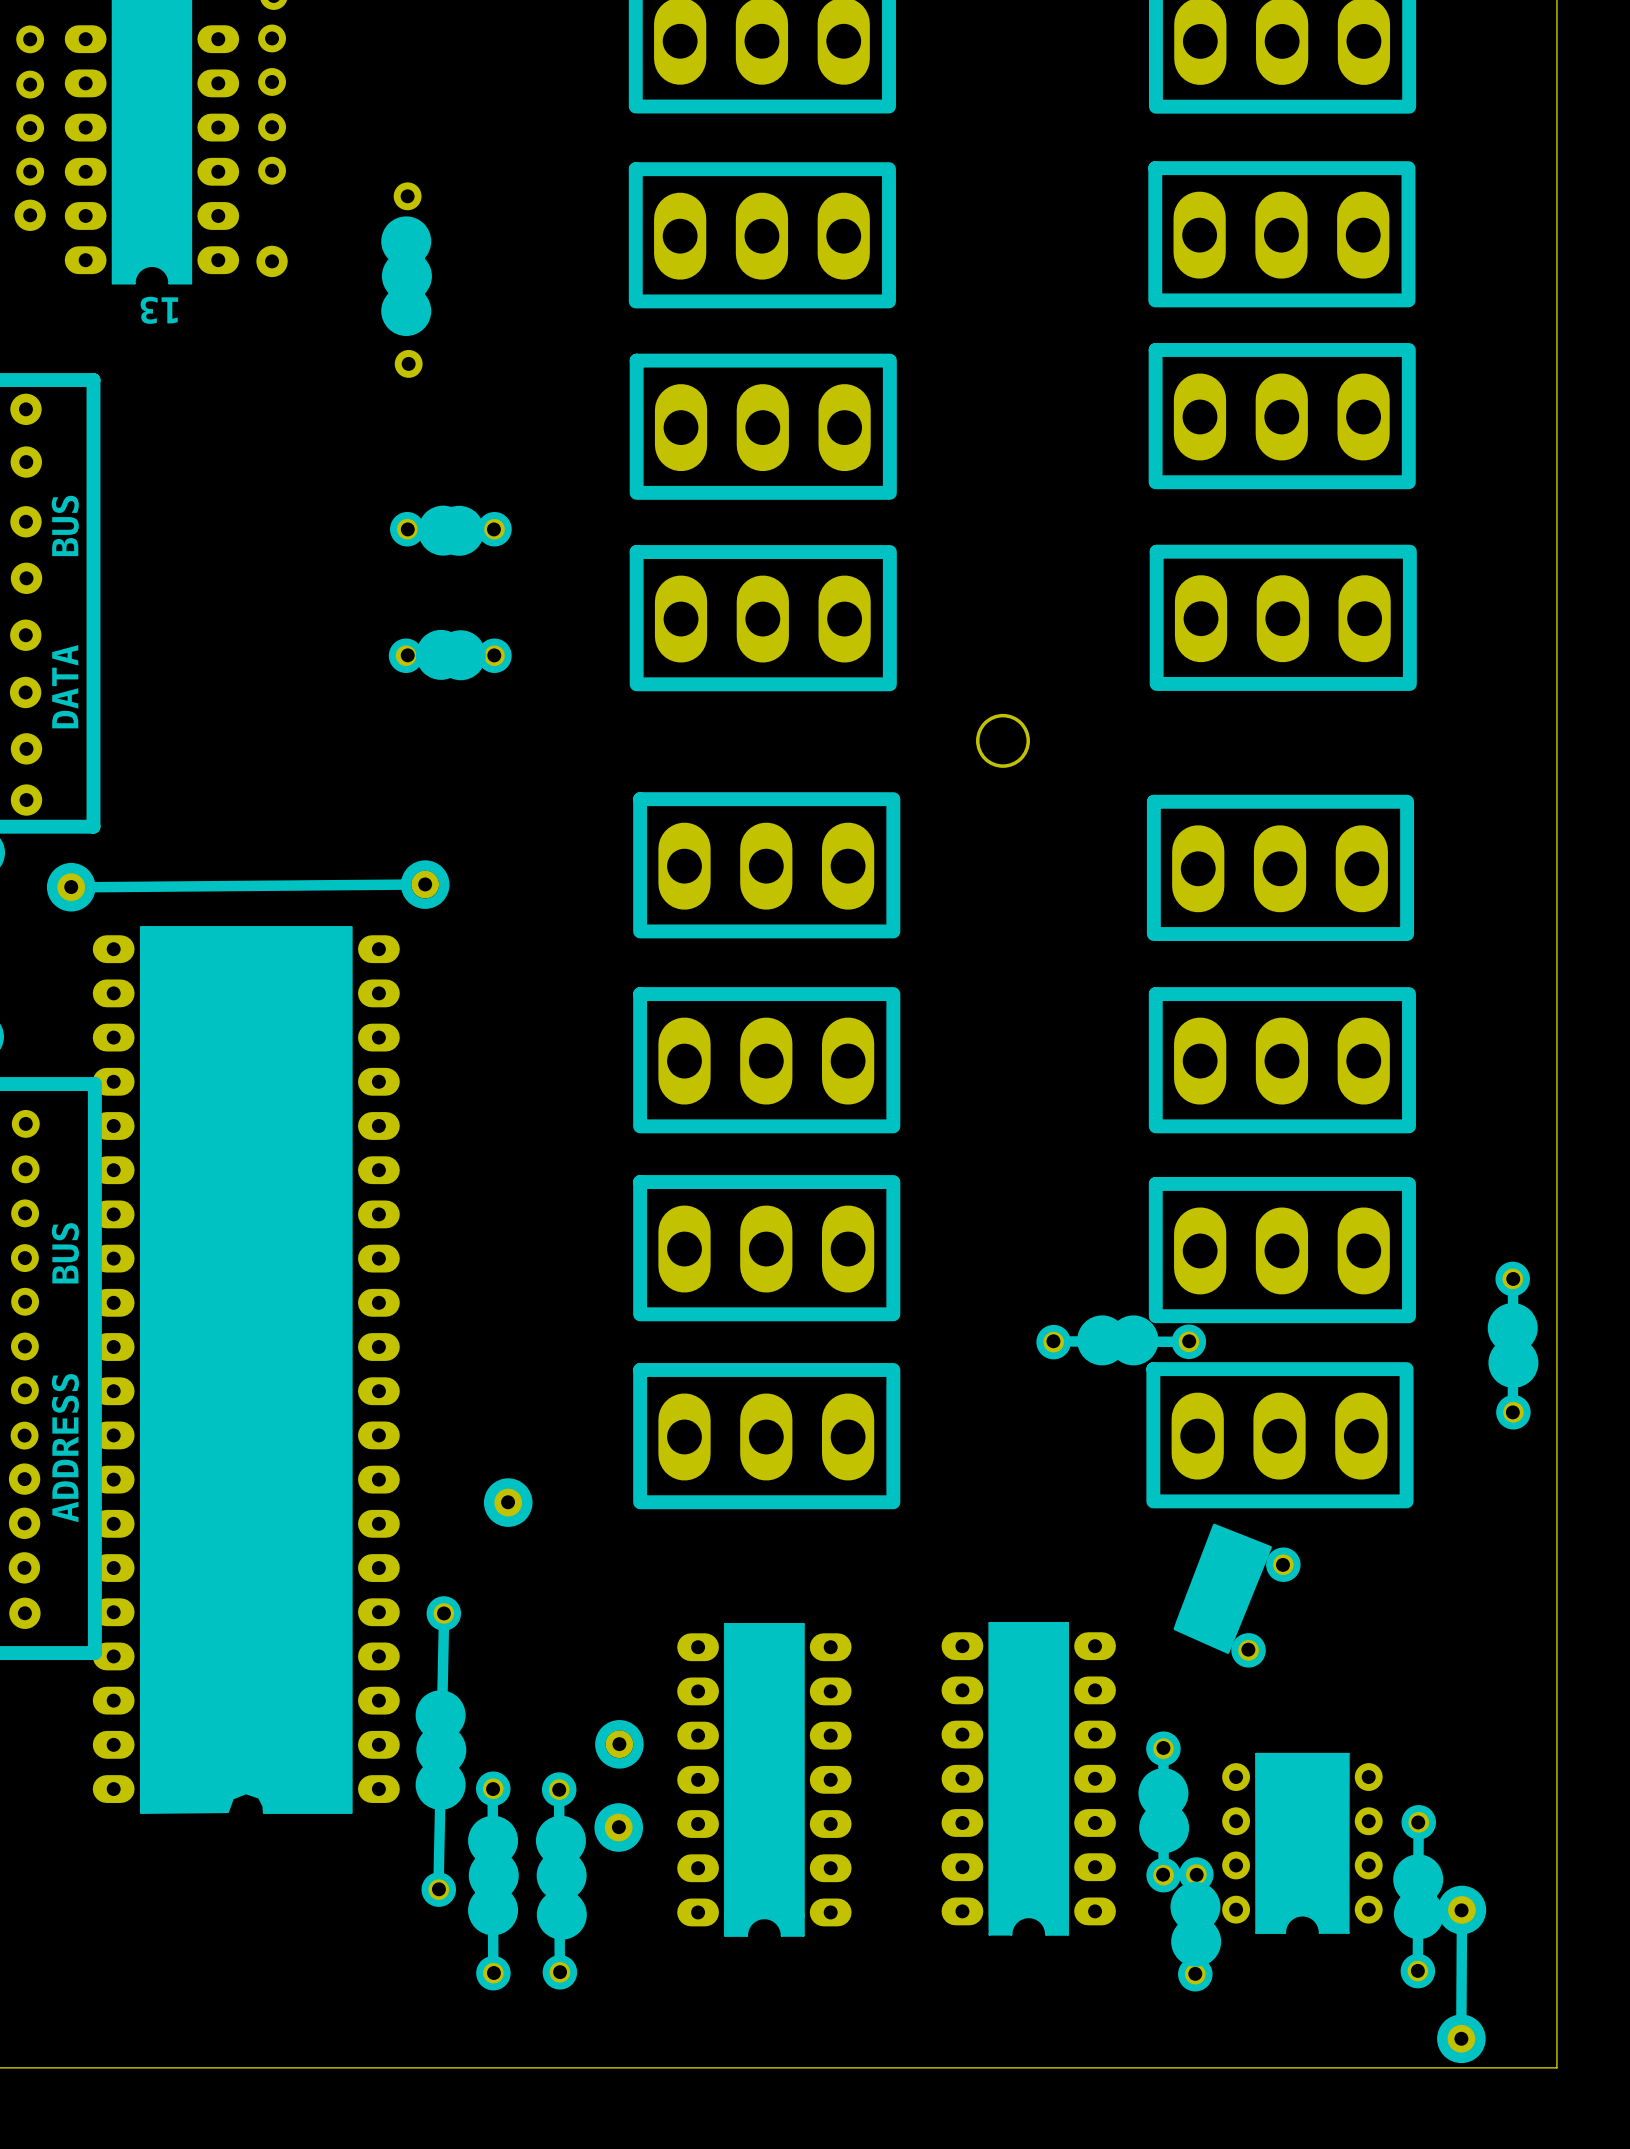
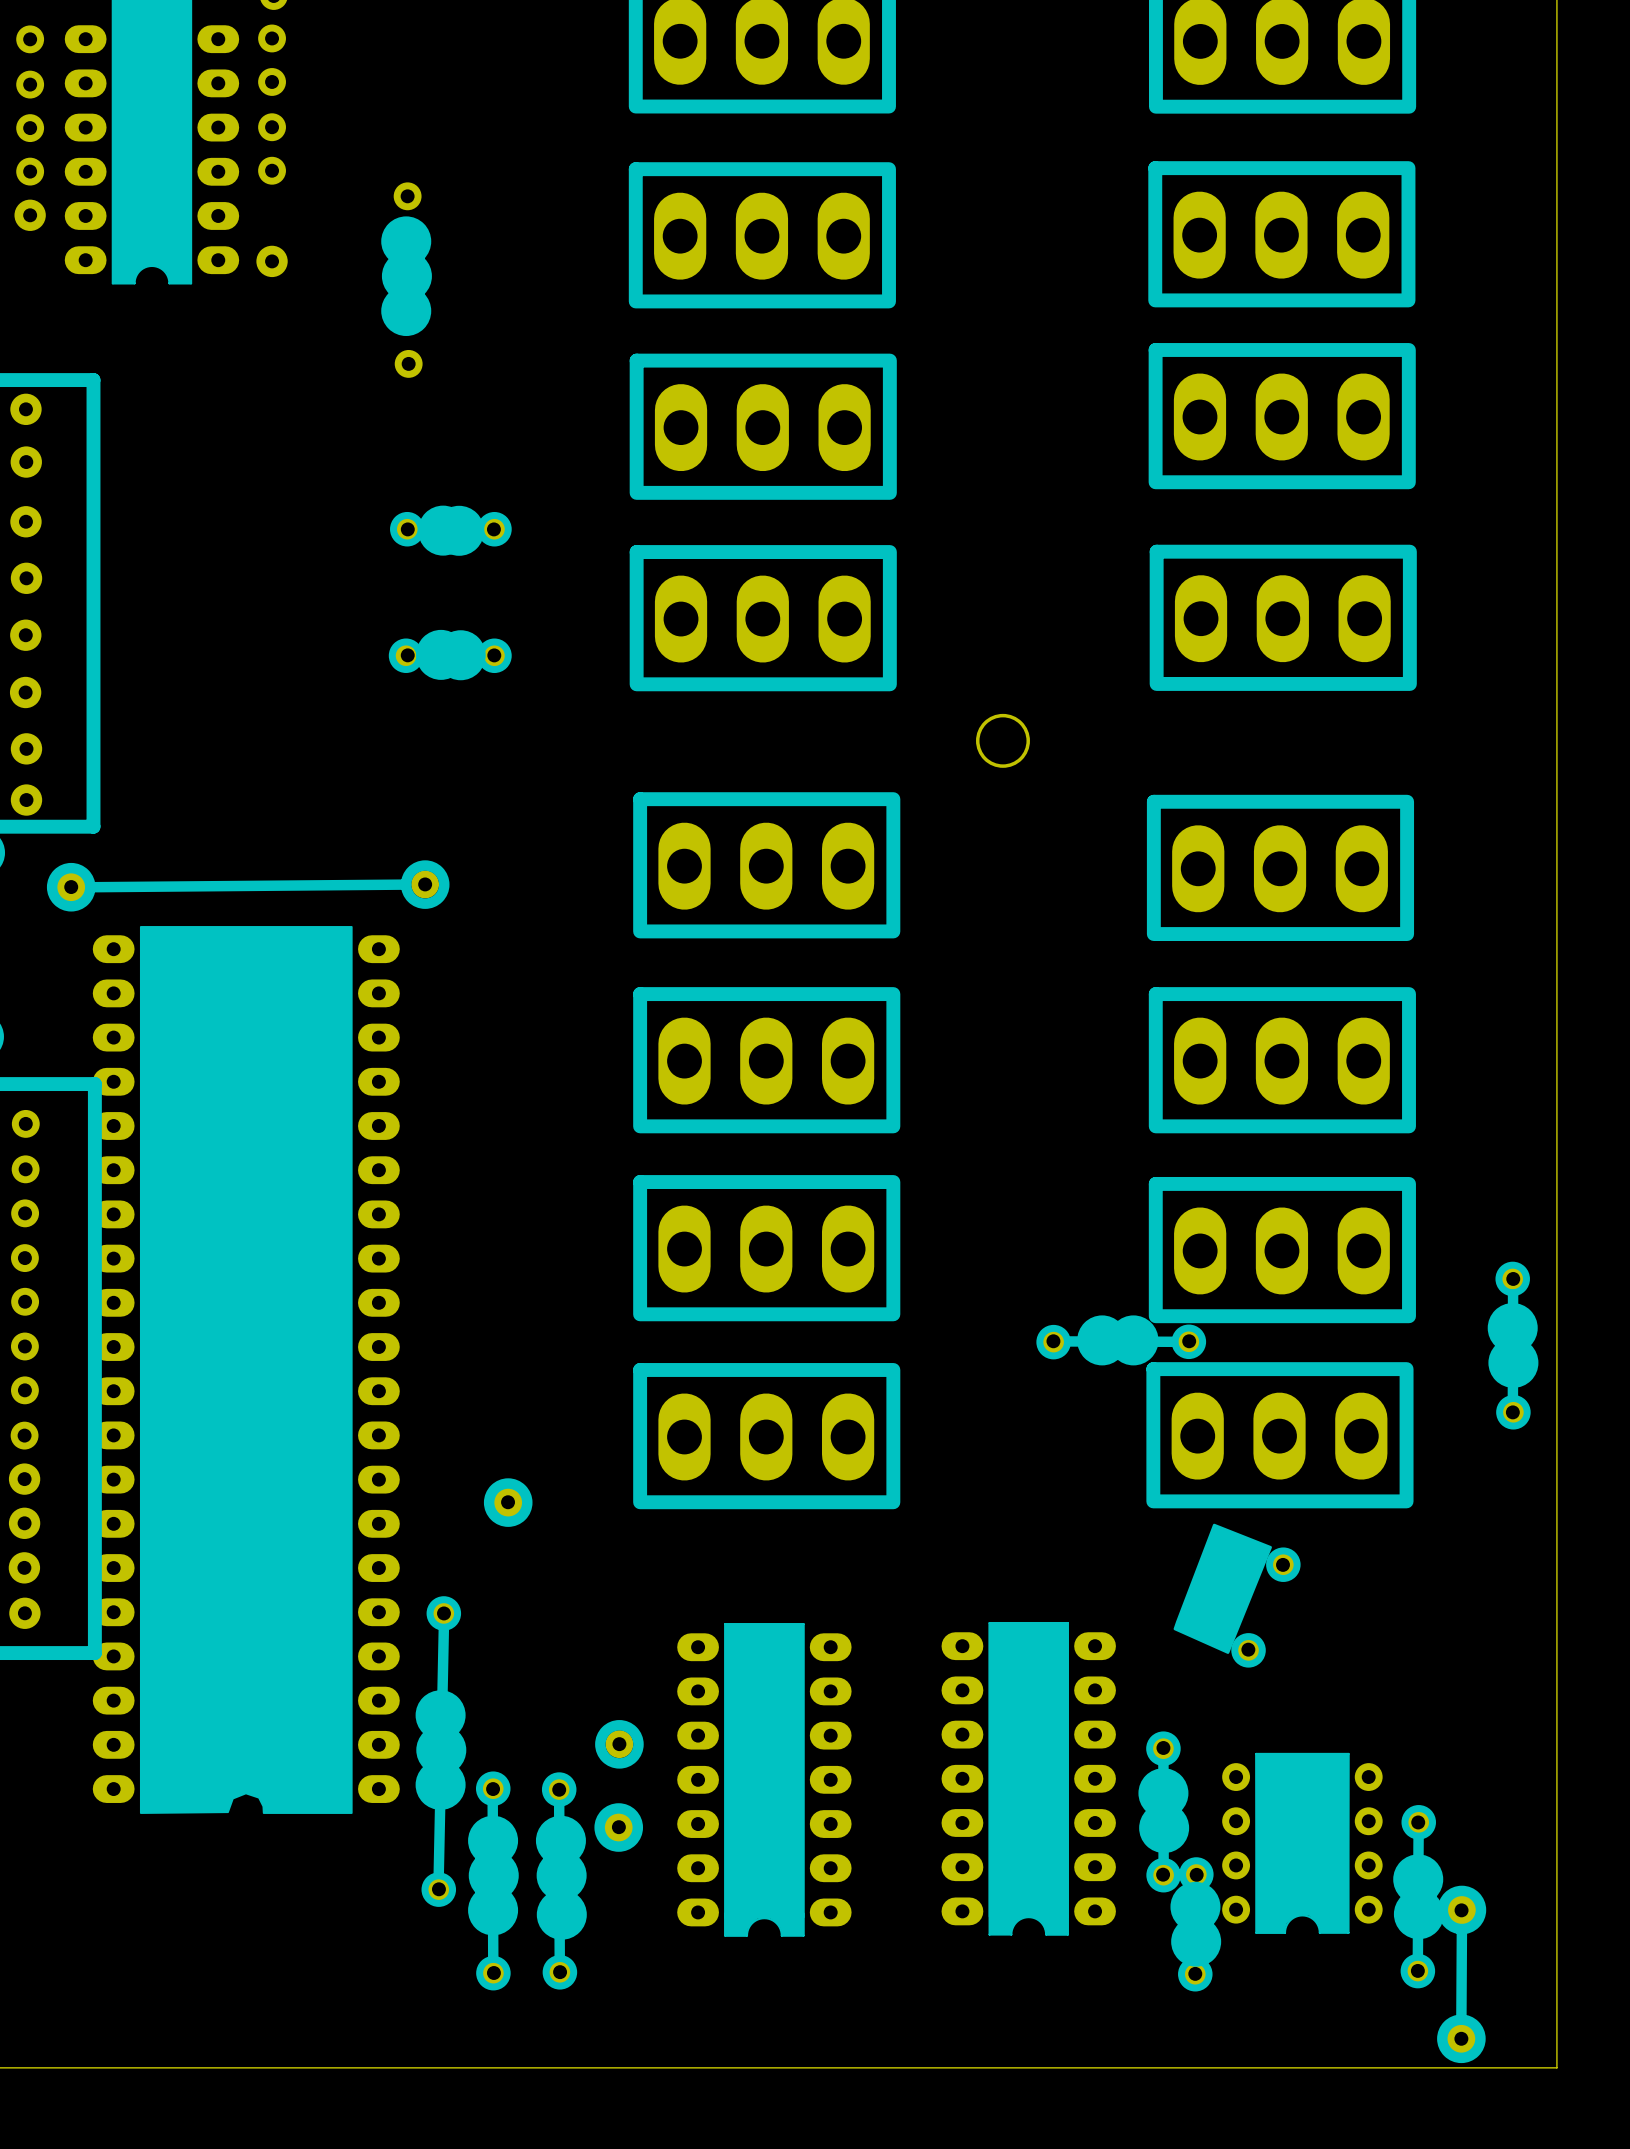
text: 13 (159, 310) -> none
text: DATA BUS (65, 612) -> none
text: ADDRESS BUS (65, 1372) -> none

